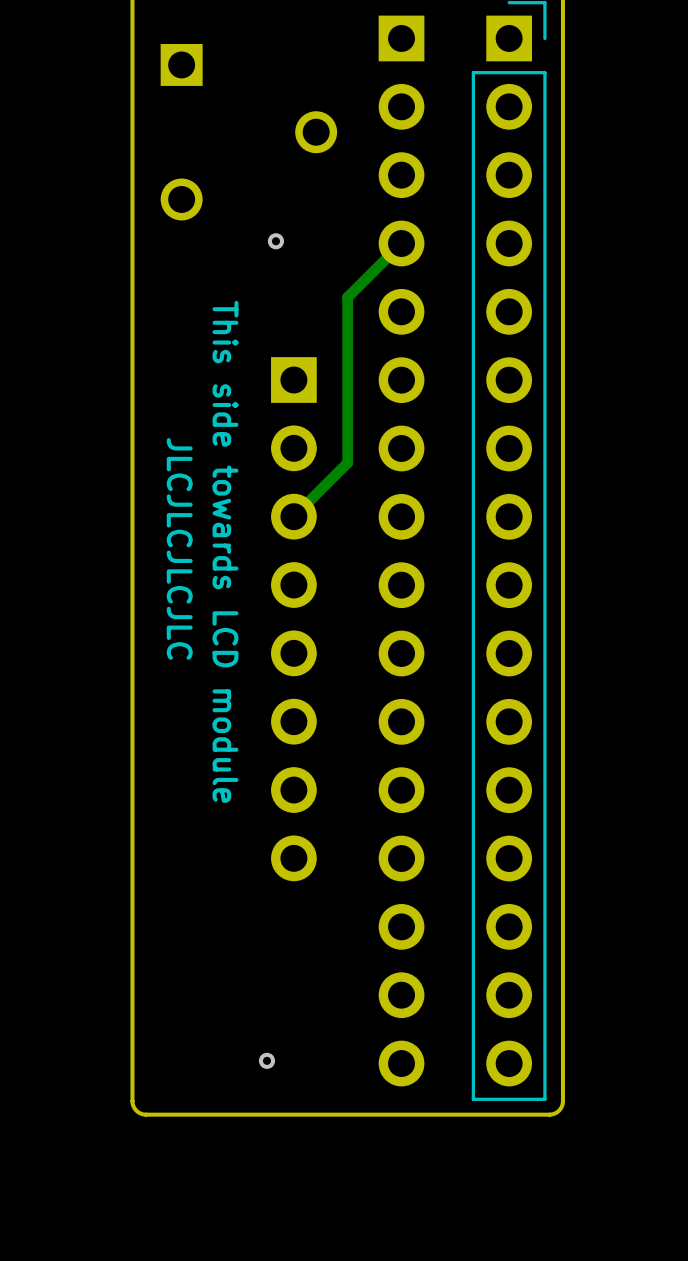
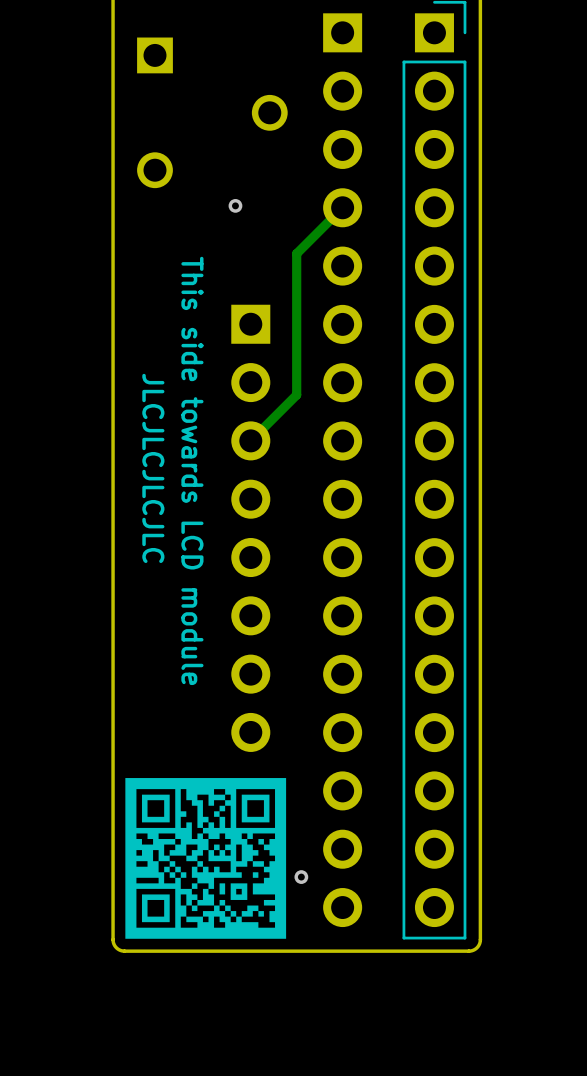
drawing: none -> [125, 778, 287, 939]
via position: (267, 1060) -> (301, 877)

